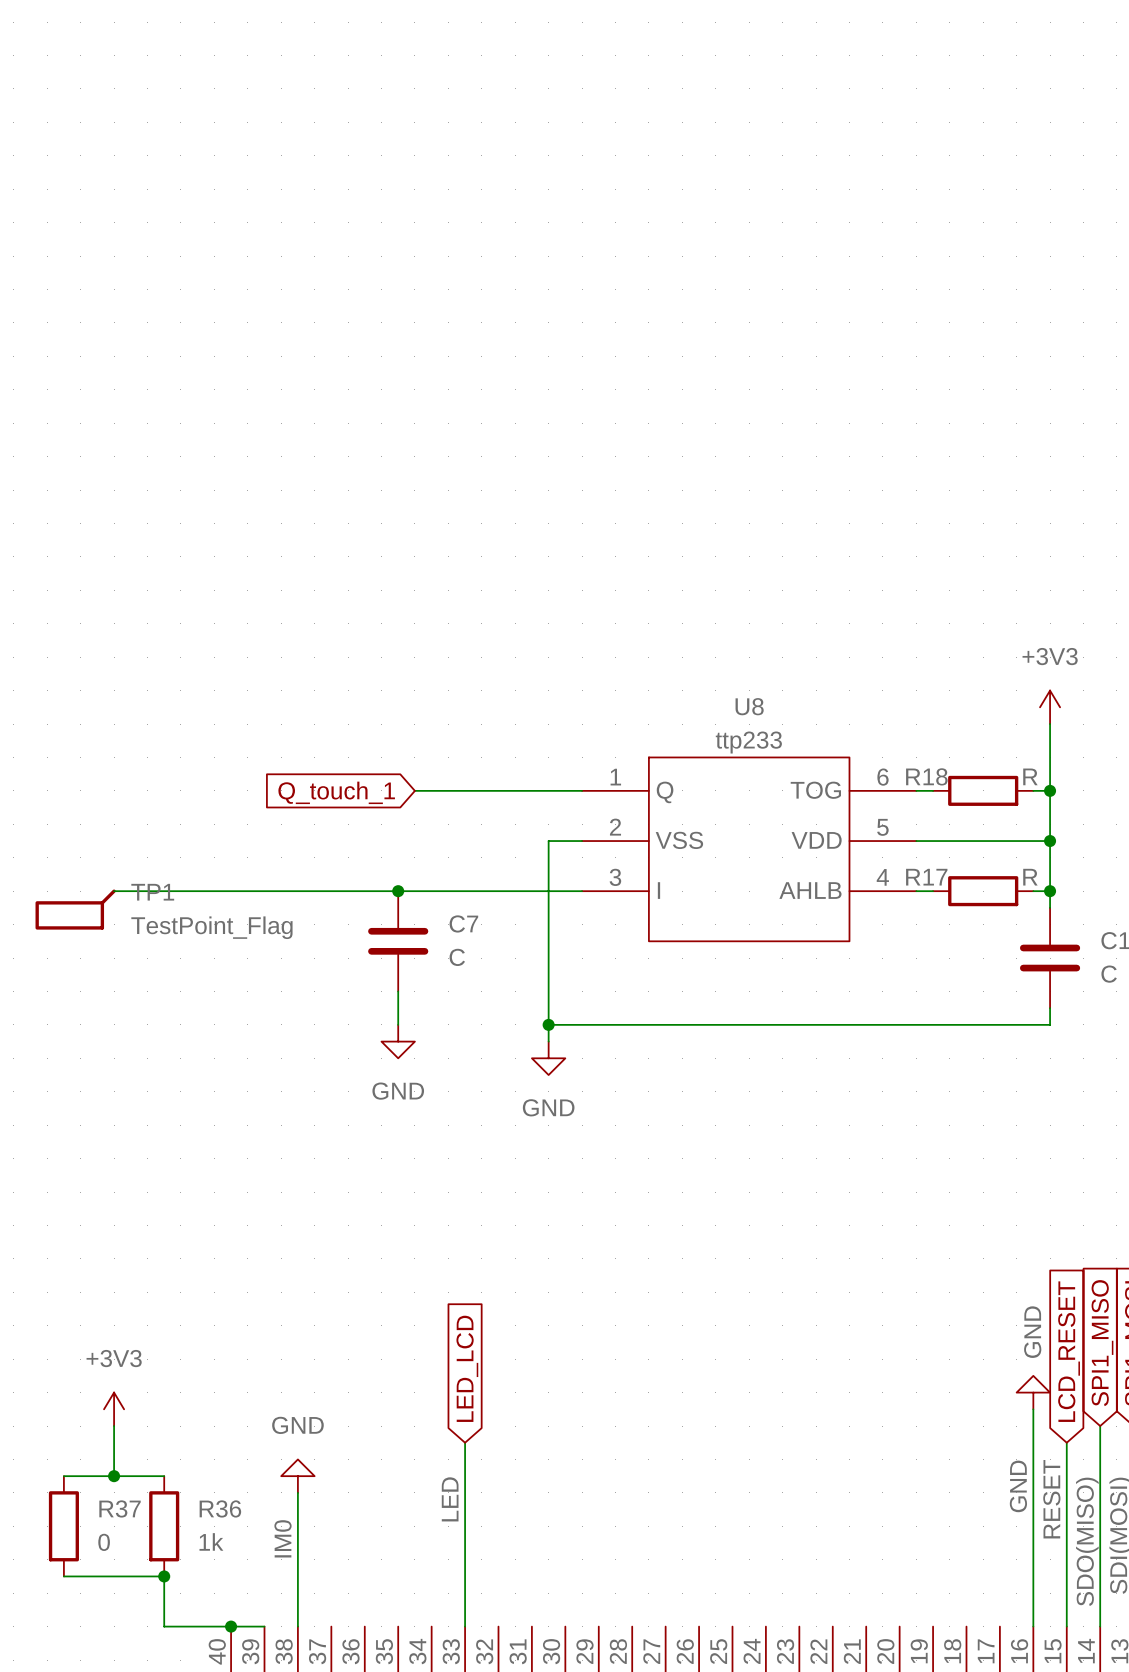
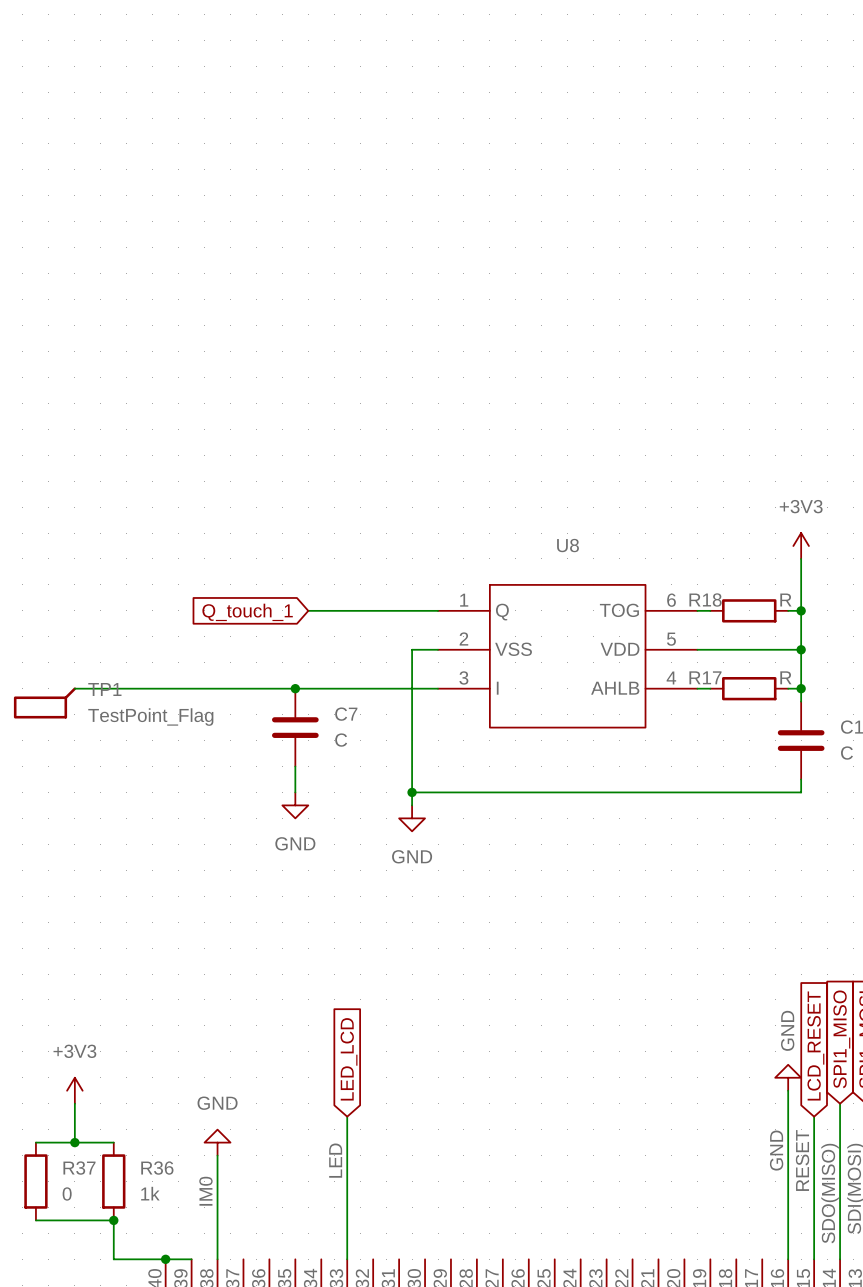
U8 value: ttp233 (748, 742) -> none

